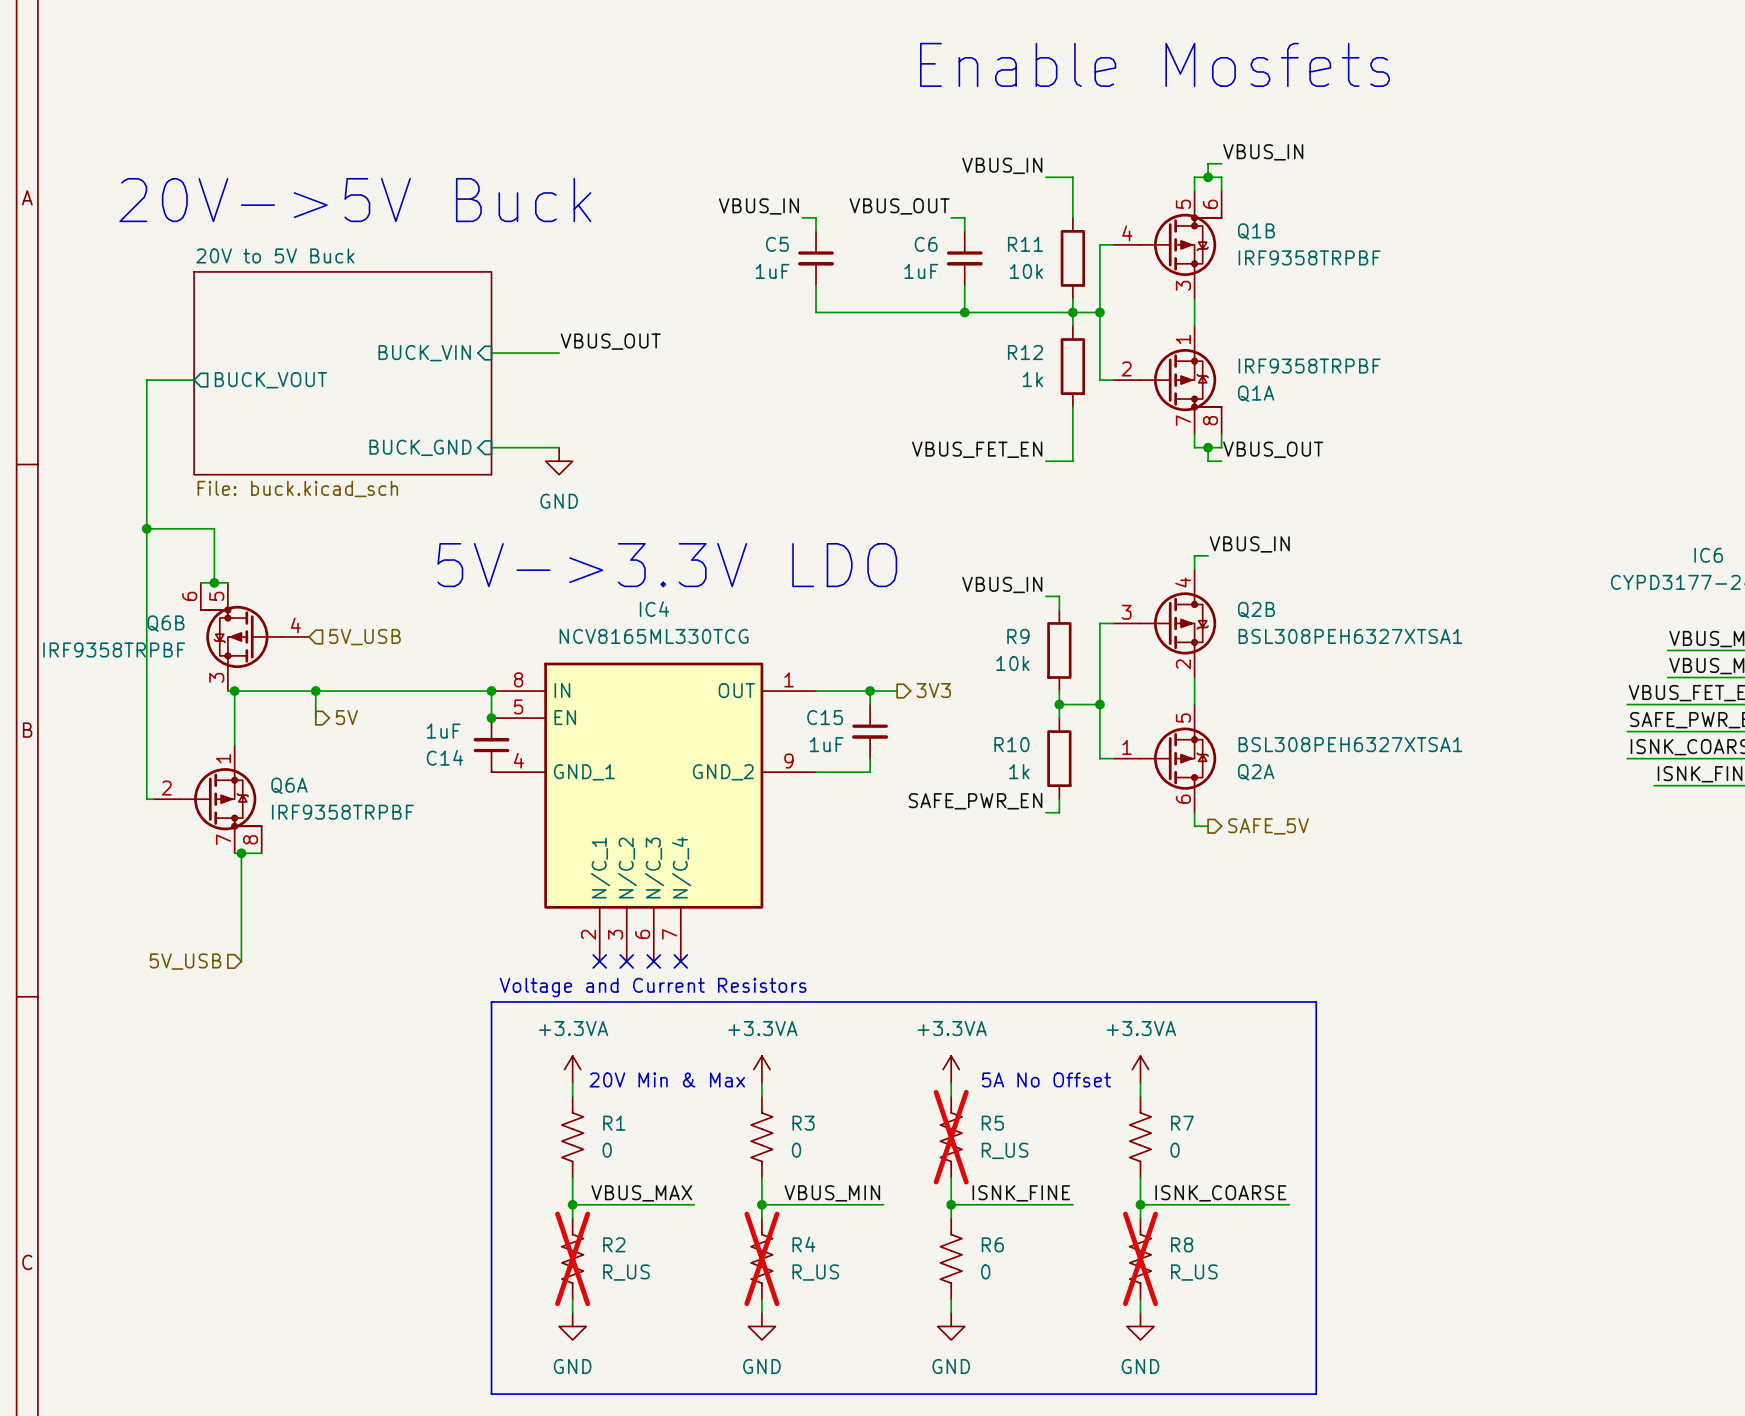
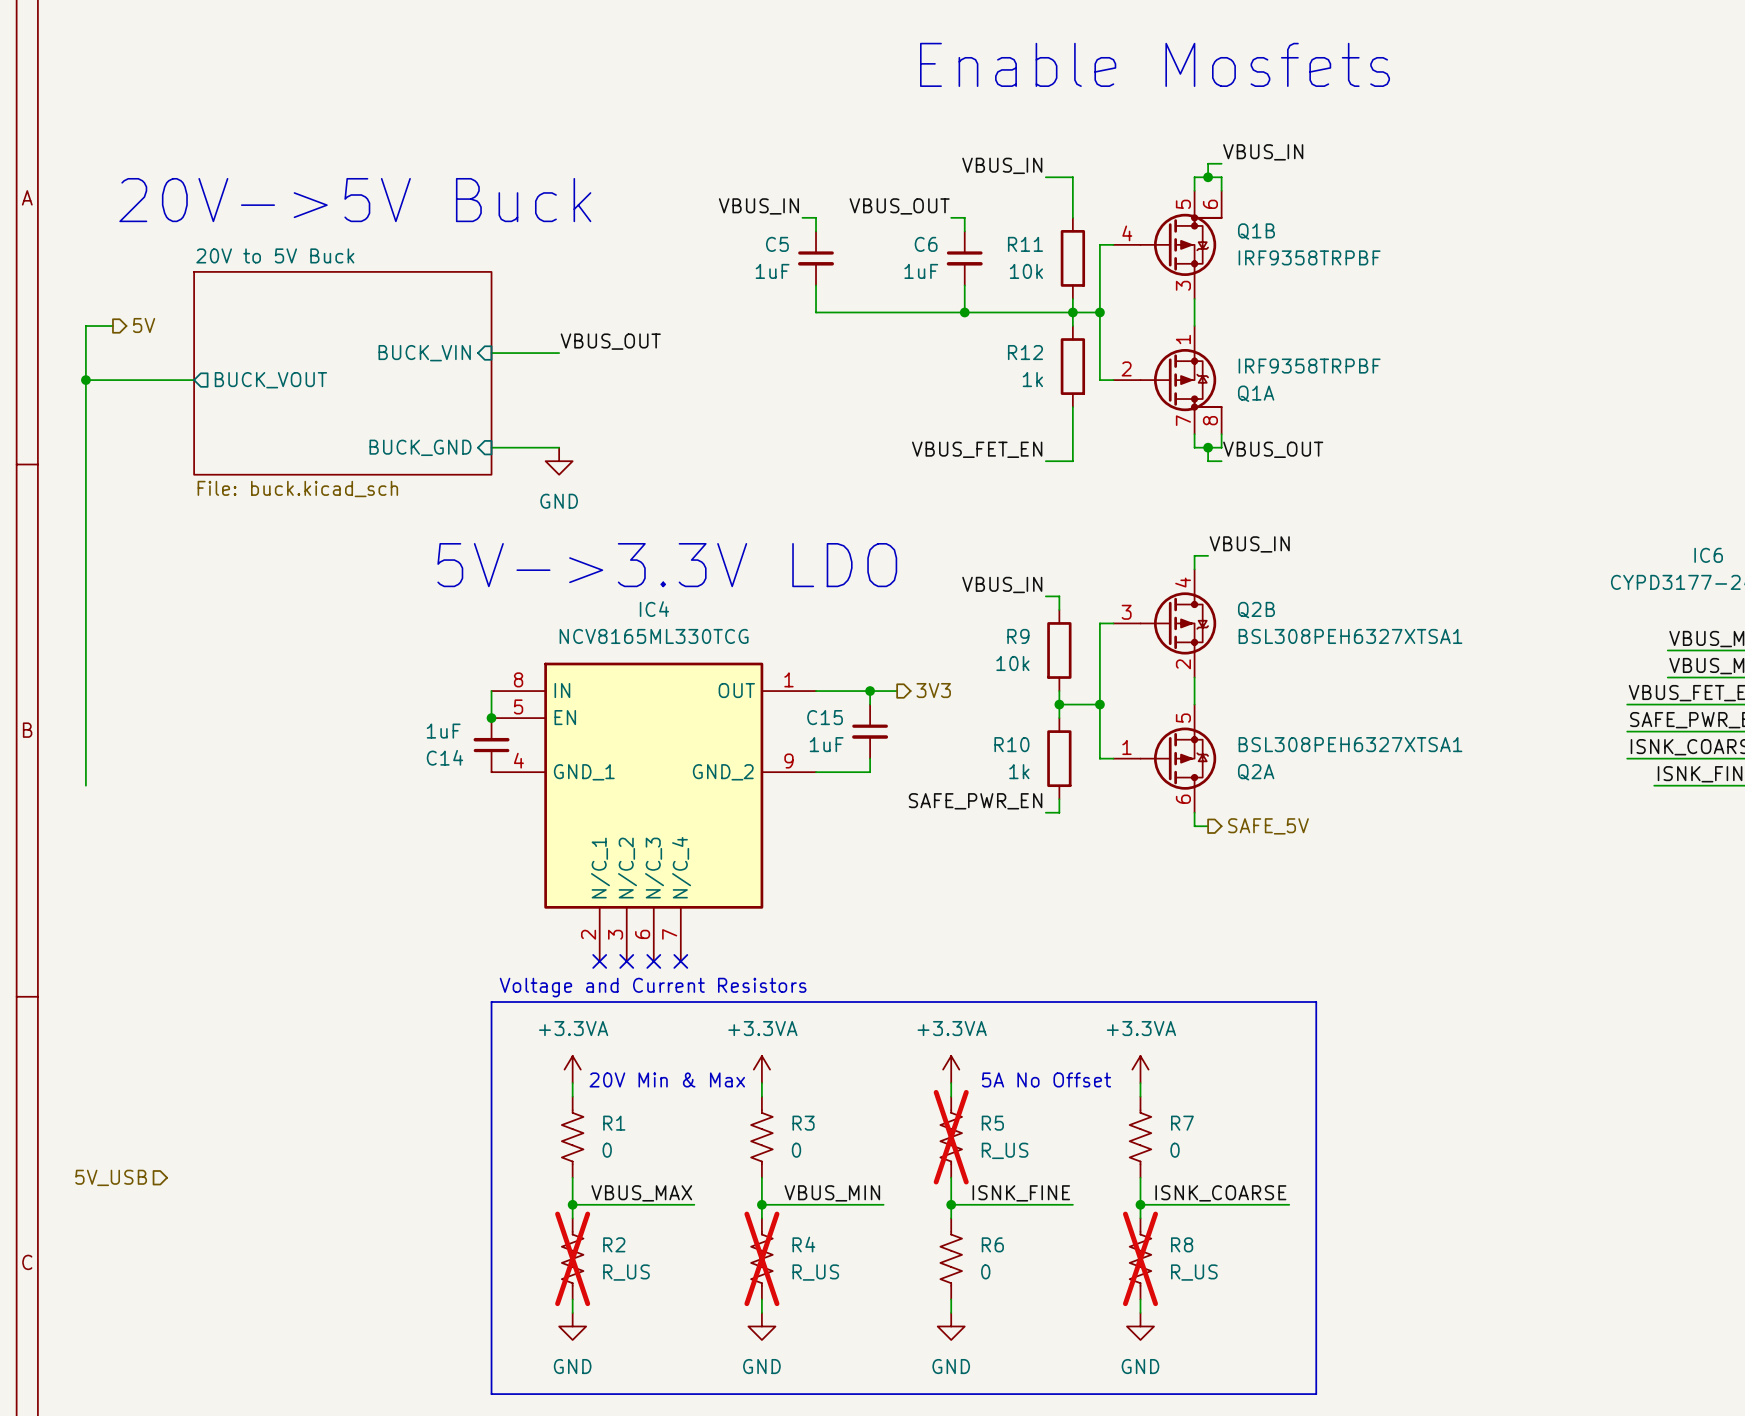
hierarchical label: none -> 5V (144, 325)
wire: none -> (112, 326) (85, 326) (85, 785)
junction: none -> (85, 380)
wire: (146, 380) (146, 799) (153, 799) -> (146, 380) (85, 380)
wire: (146, 528) (214, 528) (214, 582) -> none
junction: (146, 528) -> none
wire: (200, 582) (227, 582) -> none
junction: (214, 582) -> none
Q6B: IRF9358TRPBF (254, 636) -> none
hierarchical label: 5V_USB (364, 637) -> none
wire: (227, 691) (491, 691) -> none
wire: (234, 691) (234, 745) -> none
junction: (234, 691) -> none
wire: (315, 691) (315, 718) -> none
junction: (315, 691) -> none
junction: (491, 691) -> none
hierarchical label: 5V (346, 717) -> none
Q6A: IRF9358TRPBF (207, 799) -> none
wire: (234, 853) (261, 853) -> none
wire: (241, 853) (241, 961) -> none
junction: (241, 853) -> none
hierarchical label position: 5V_USB (185, 961) -> 5V_USB (111, 1177)

